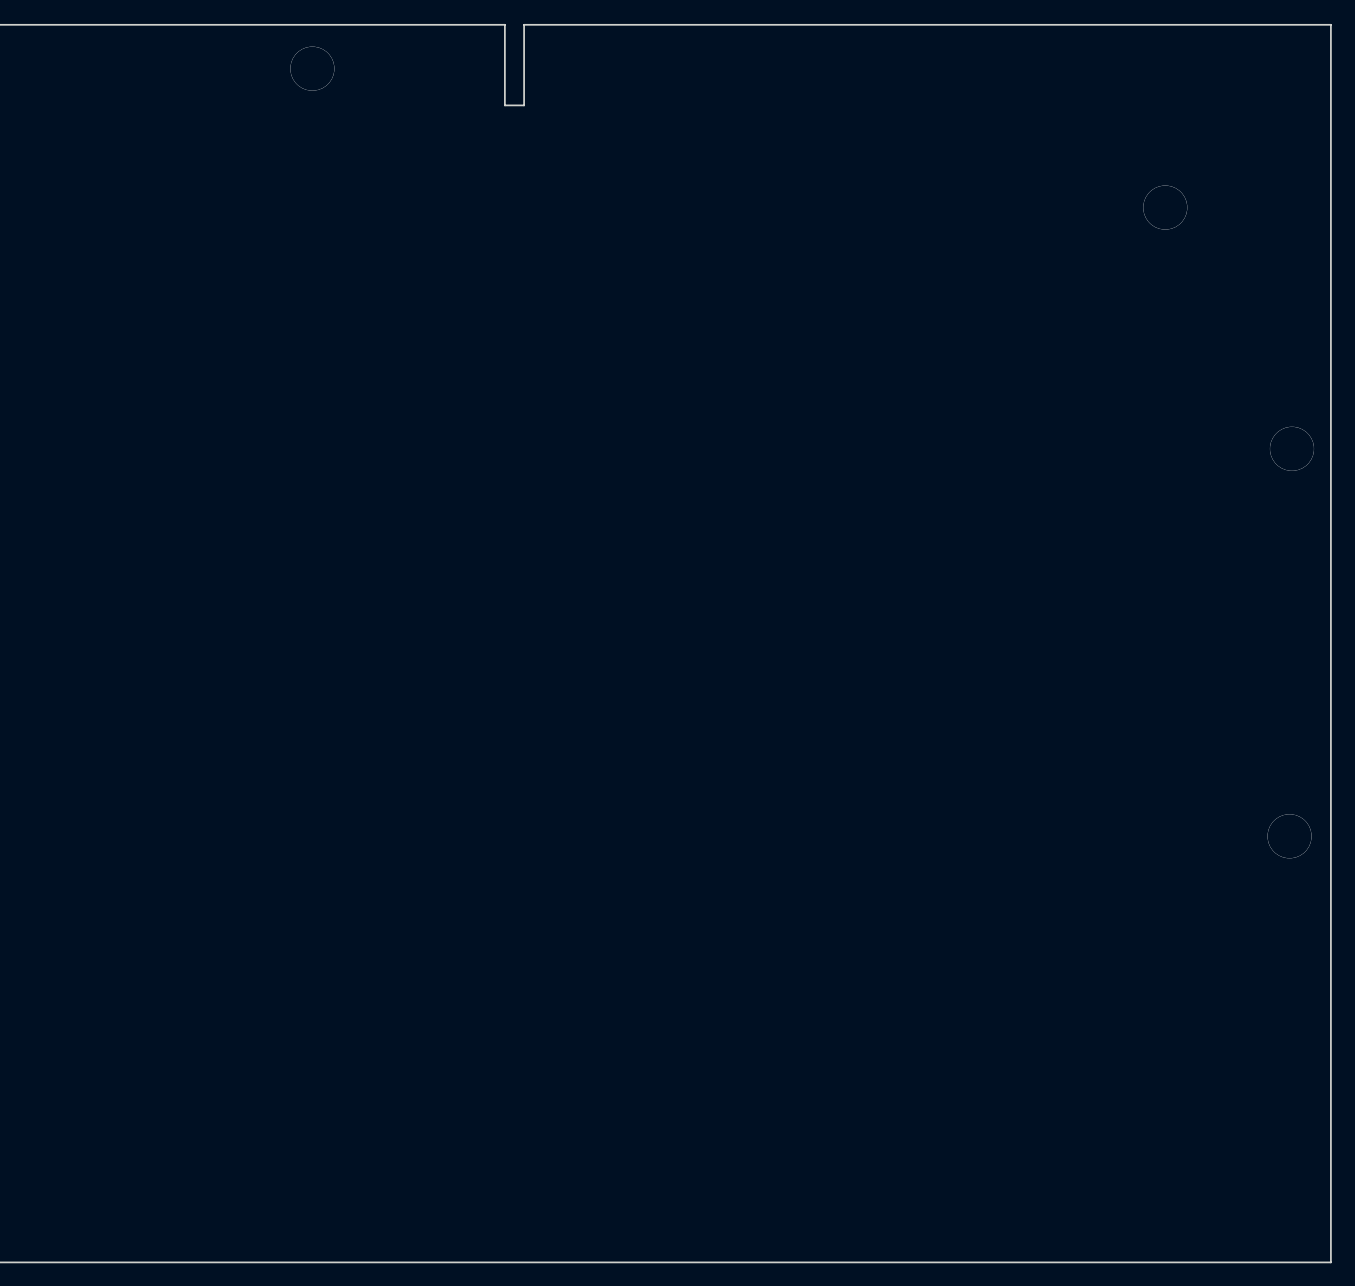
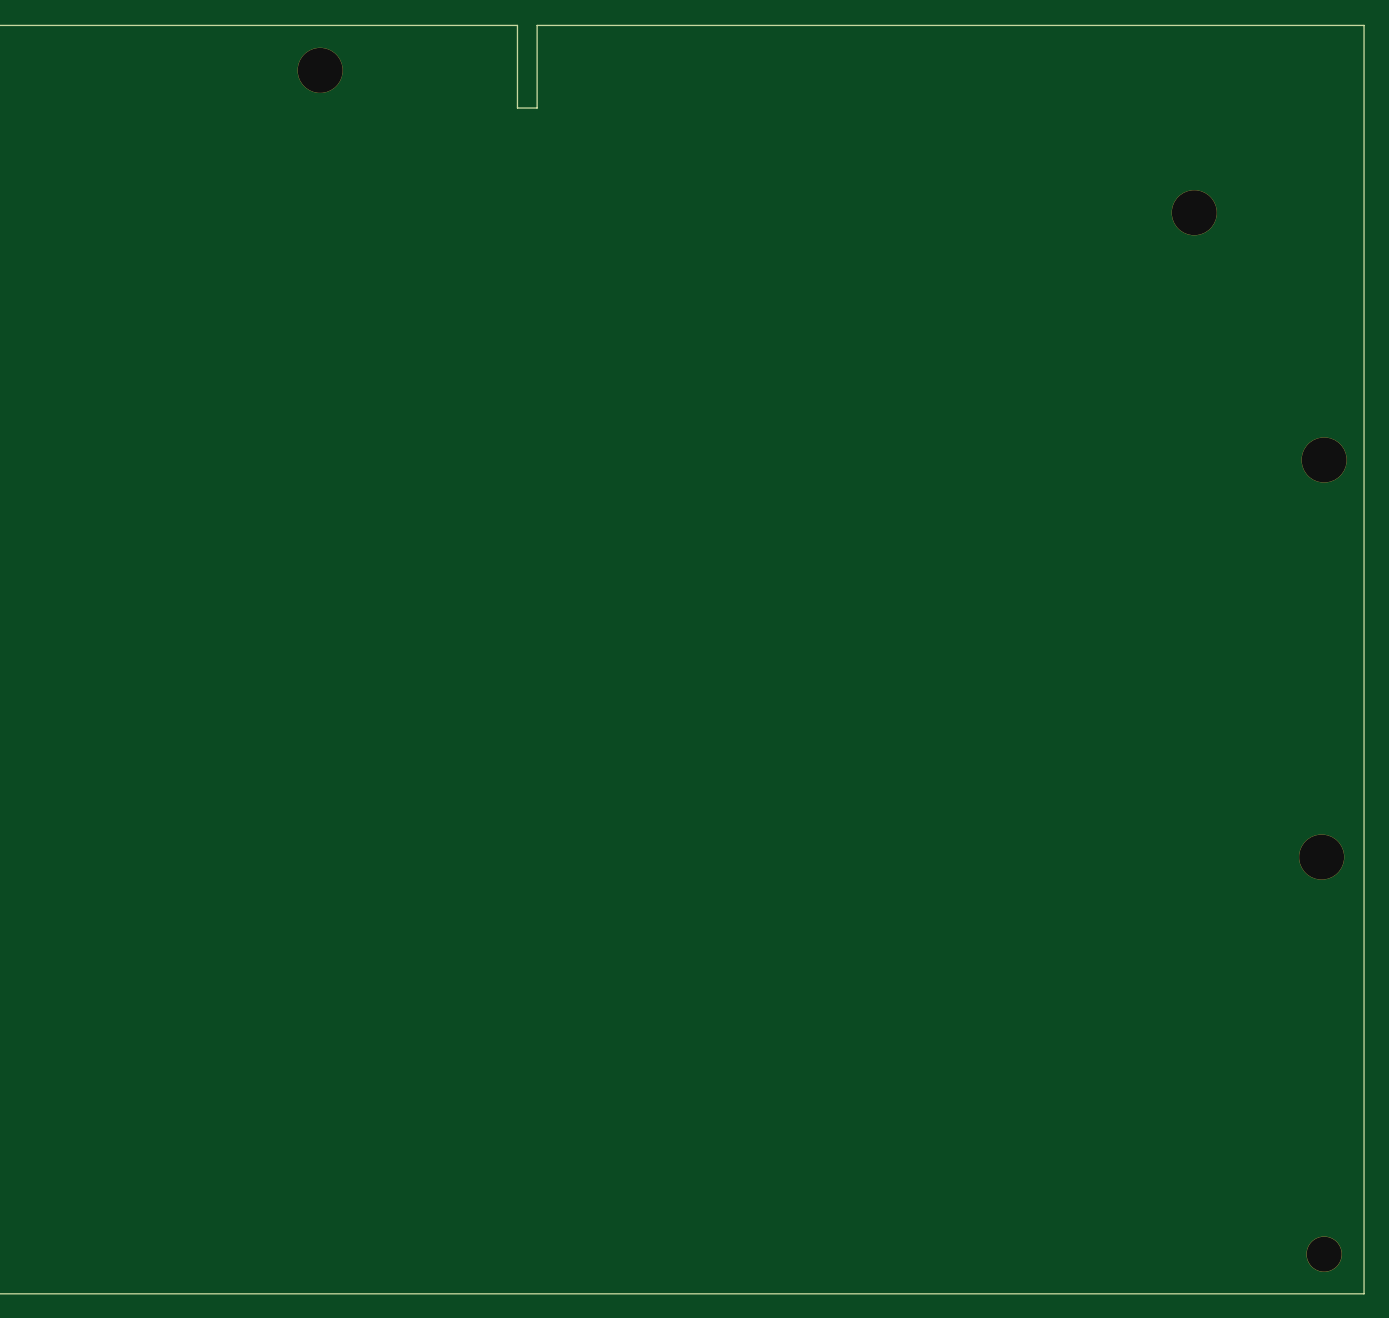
via: none -> (1324, 1254)

